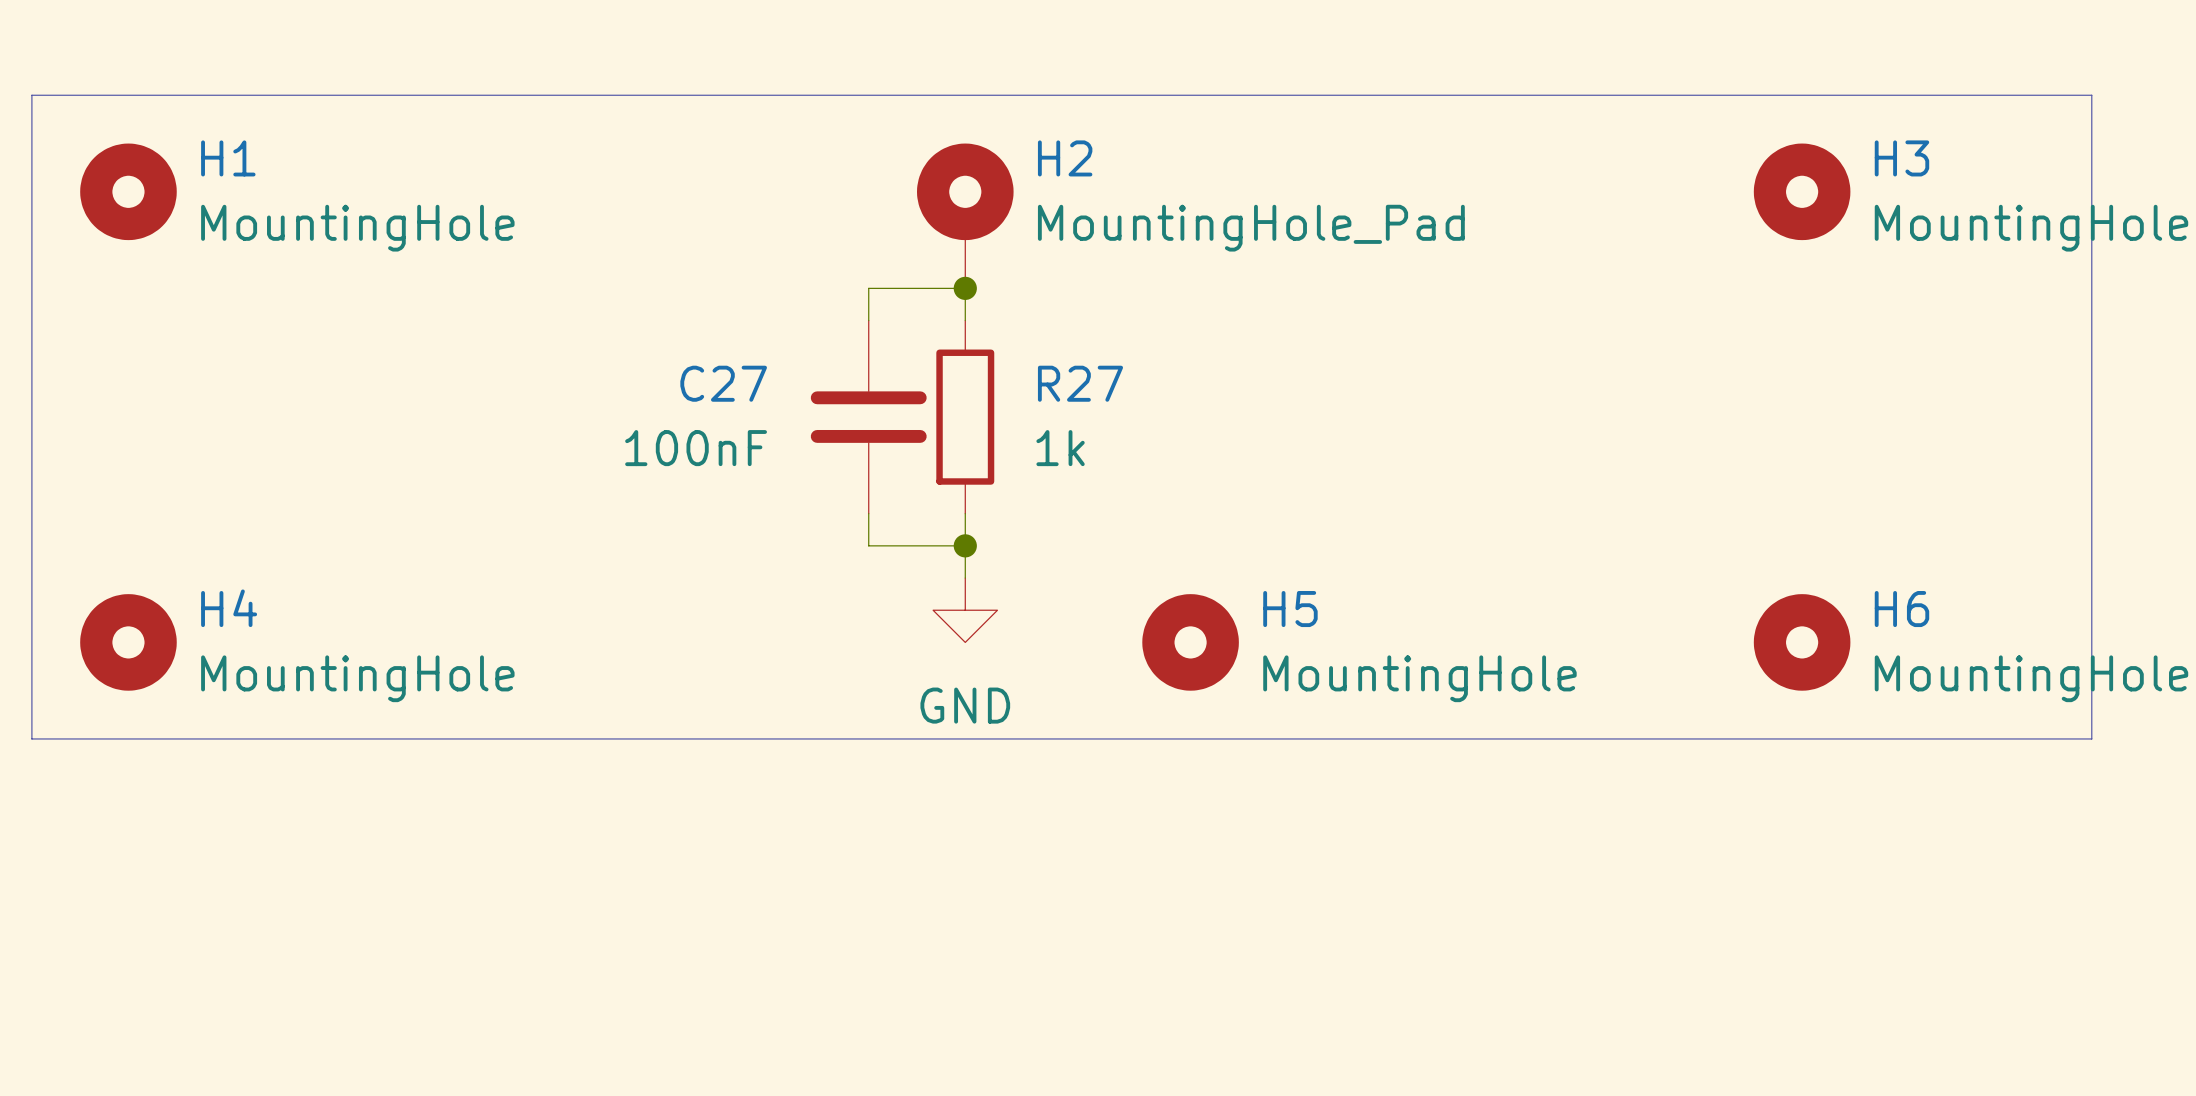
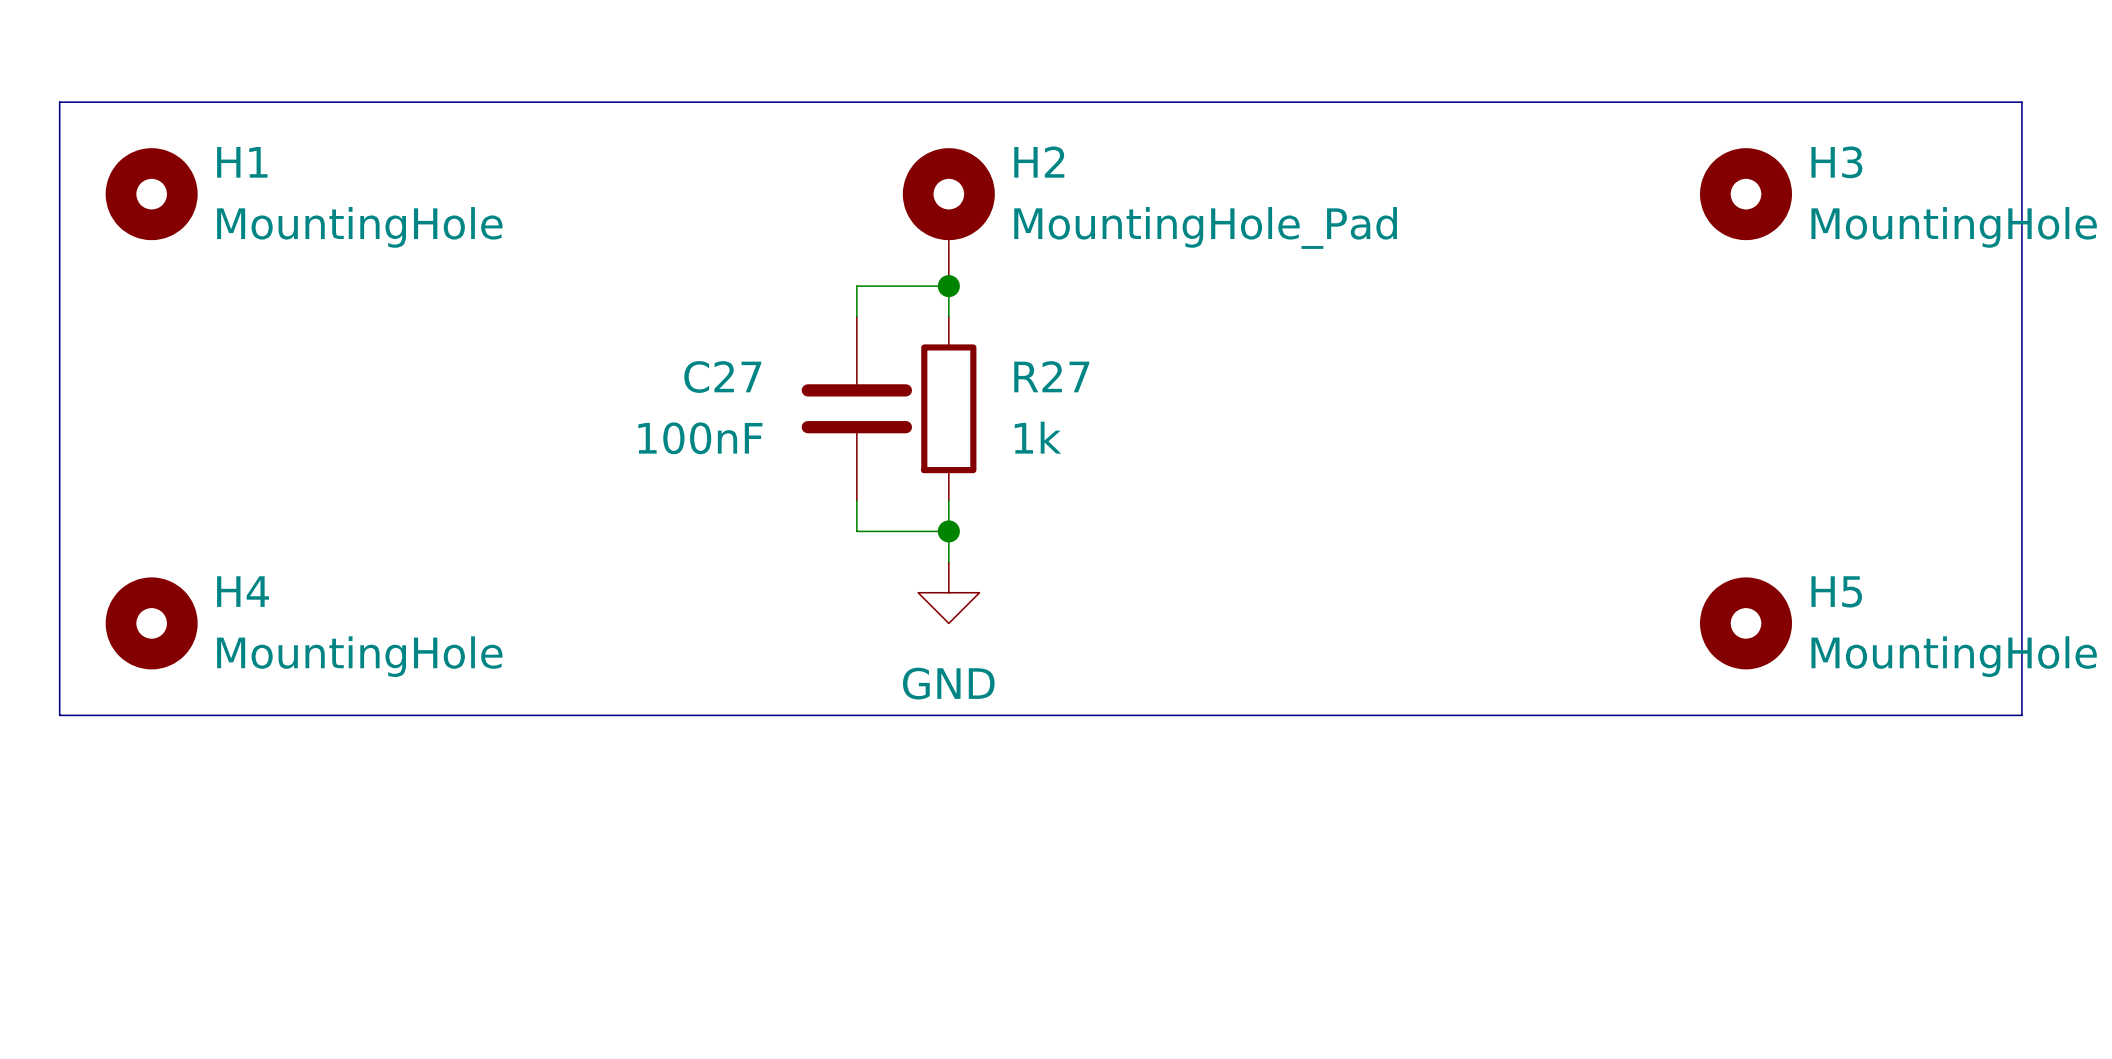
H6 name: H6 (1901, 609) -> H5 (1836, 591)
H5: MountingHole (1190, 642) -> none

